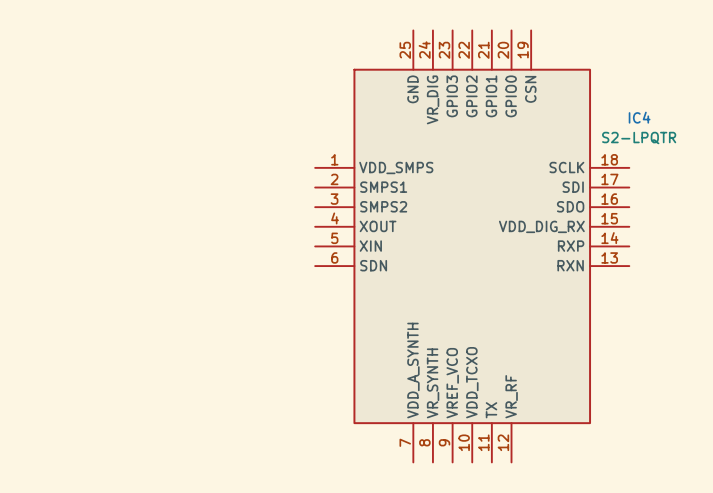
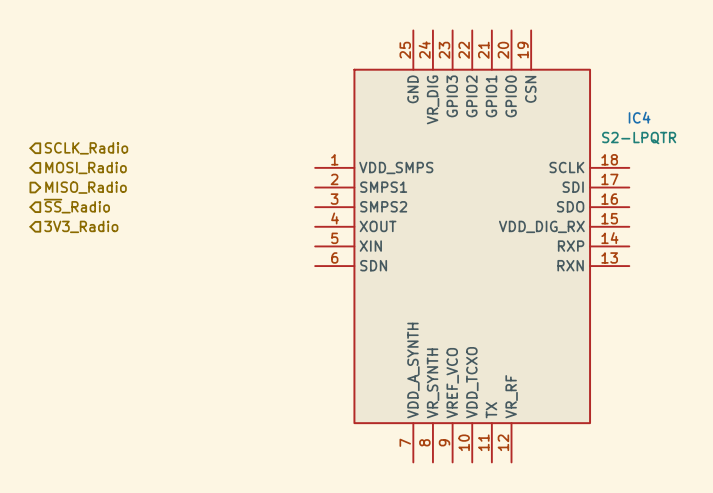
hierarchical label: none -> SCLK_Radio (86, 148)
hierarchical label: none -> MOSI_Radio (85, 167)
hierarchical label: none -> MISO_Radio (85, 187)
hierarchical label: none -> ~{SS}_Radio (76, 206)
hierarchical label: none -> 3V3_Radio (81, 226)

